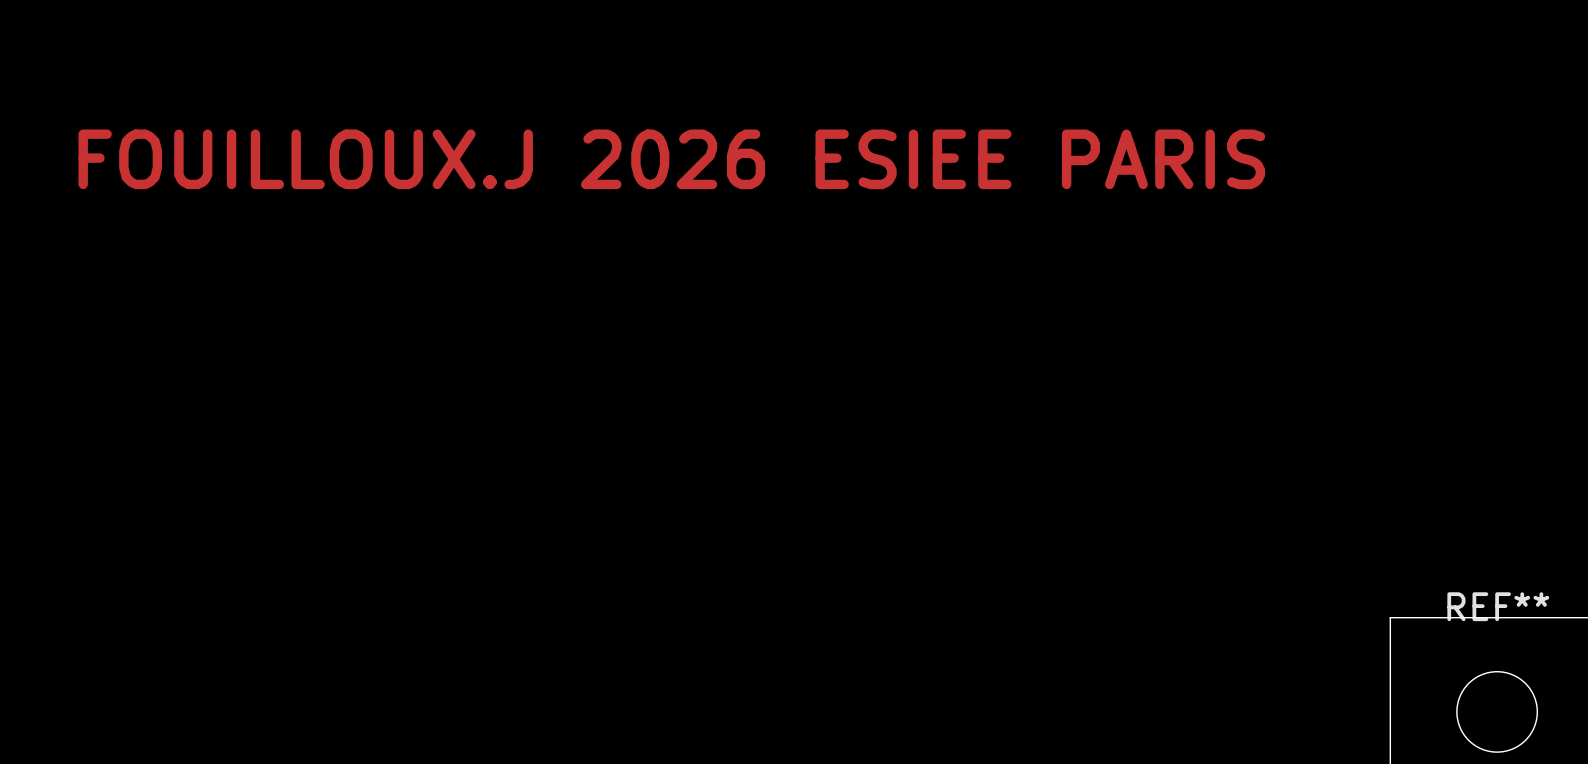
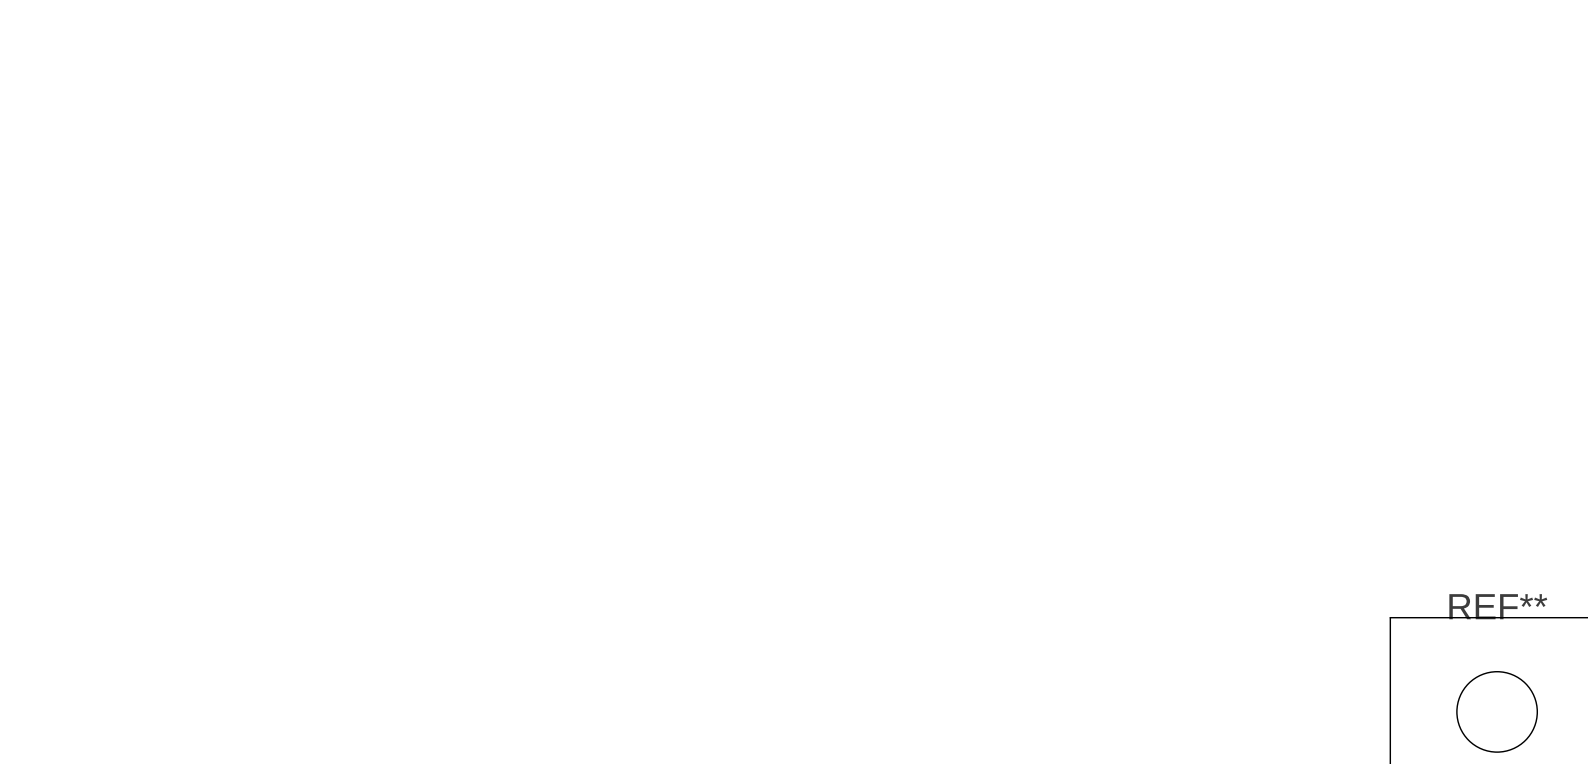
text: FOUILLOUX.J 2026 ESIEE PARIS (671, 159) -> none

